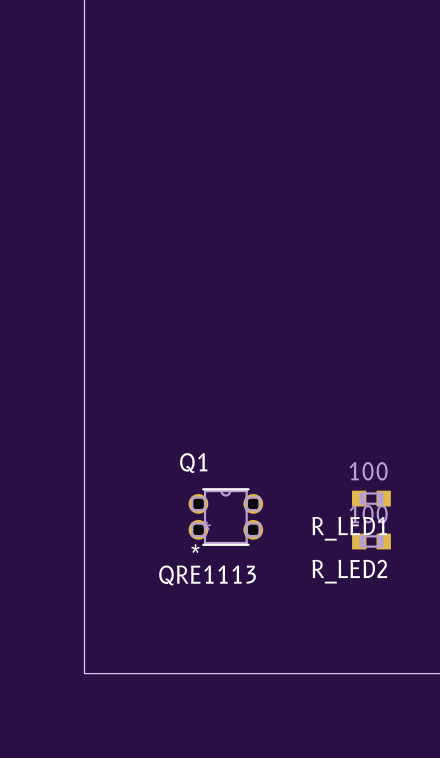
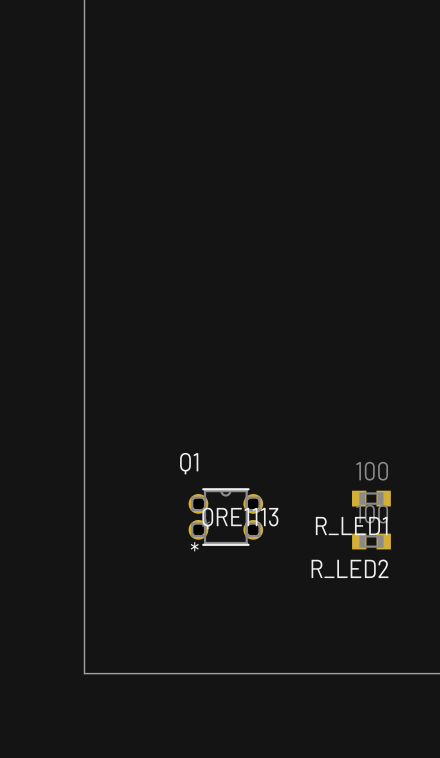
Q1 value position: QRE1113 (207, 575) -> QRE1113 (240, 518)

